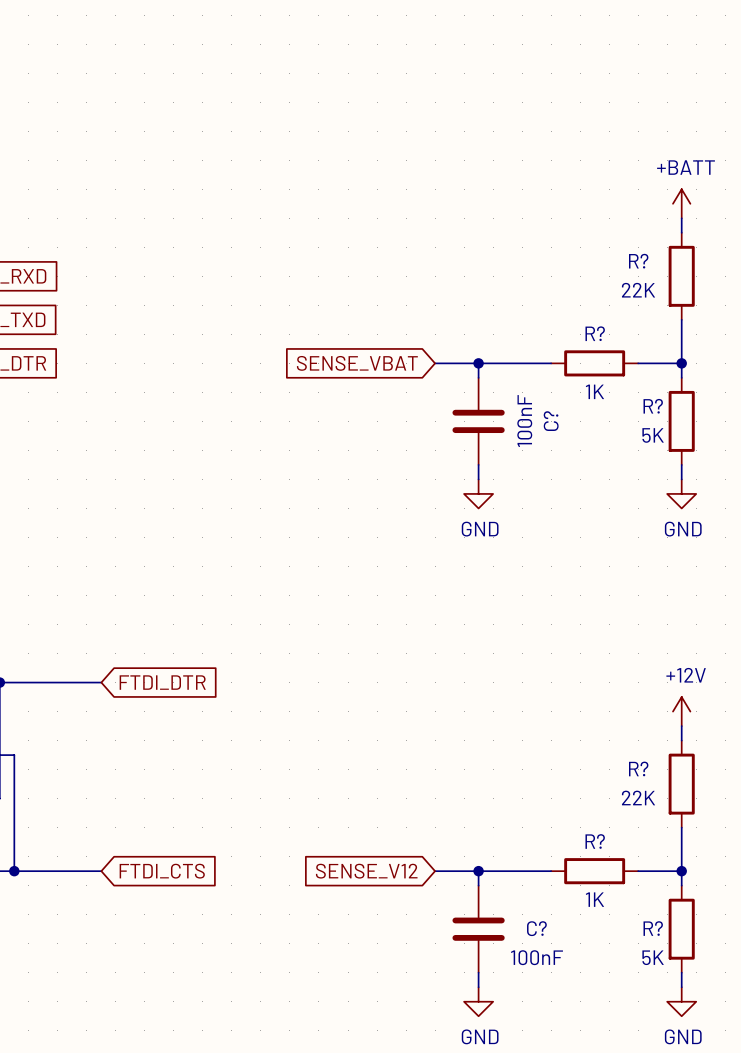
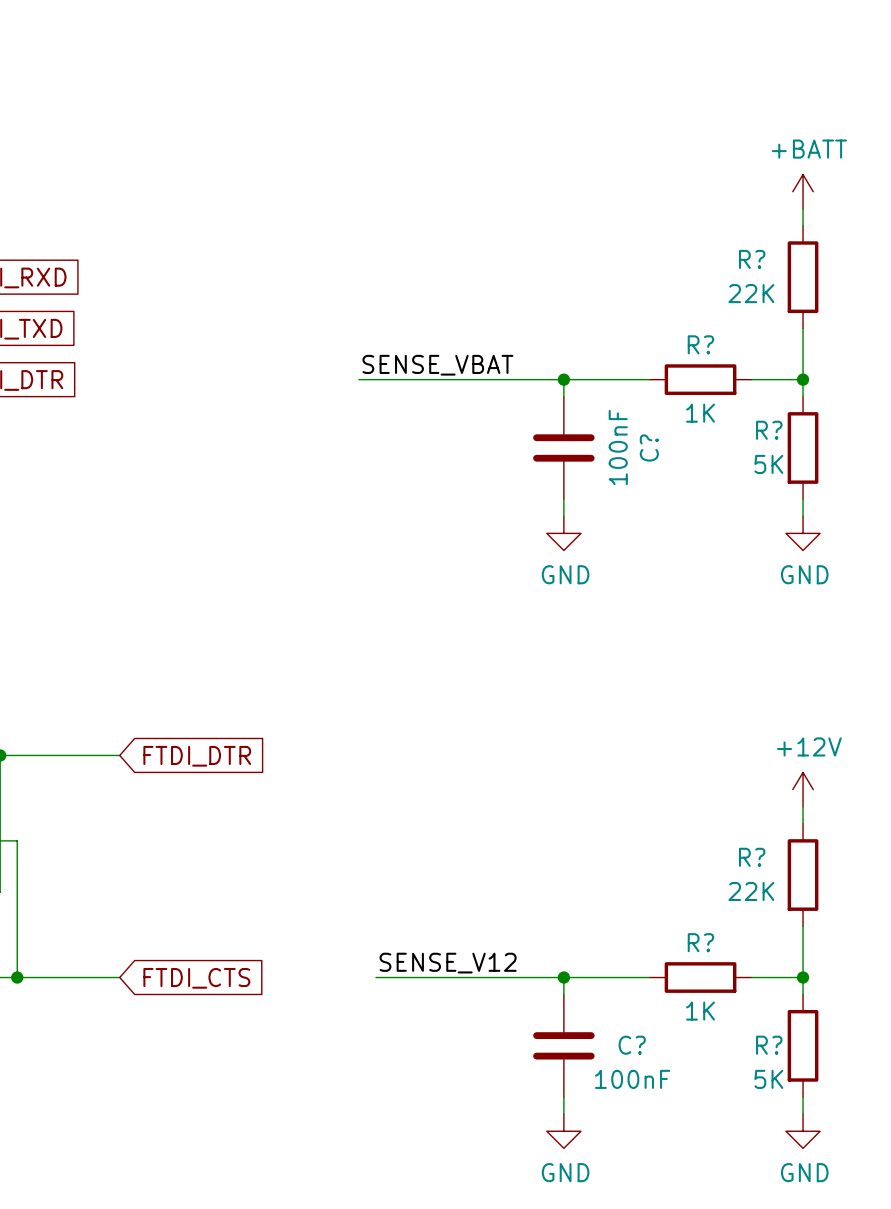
label: none -> SENSE_VBAT (437, 365)
wire: none -> (358, 379) (512, 379)
global label: SENSE_VBAT (357, 363) -> none
label: none -> SENSE_V12 (448, 963)
wire: none -> (375, 977) (512, 977)
global label: SENSE_V12 (366, 871) -> none

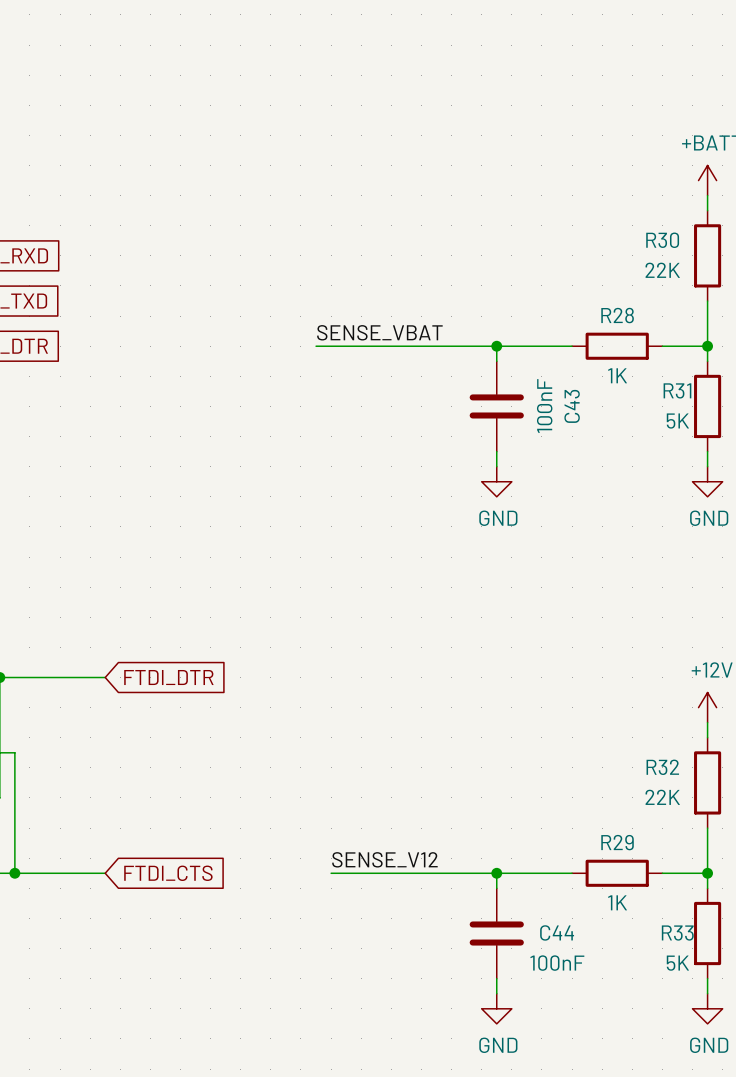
R? name: R? (752, 259) -> R30 (662, 240)
R? name: R? (700, 344) -> R28 (617, 315)
R? name: R? (769, 430) -> R31 (677, 390)
C? name: C? (649, 447) -> C43 (572, 406)
R? name: R? (752, 857) -> R32 (662, 767)
R? name: R? (700, 942) -> R29 (617, 842)
C? name: C? (632, 1045) -> C44 (557, 932)
R? name: R? (769, 1045) -> R33 (677, 933)

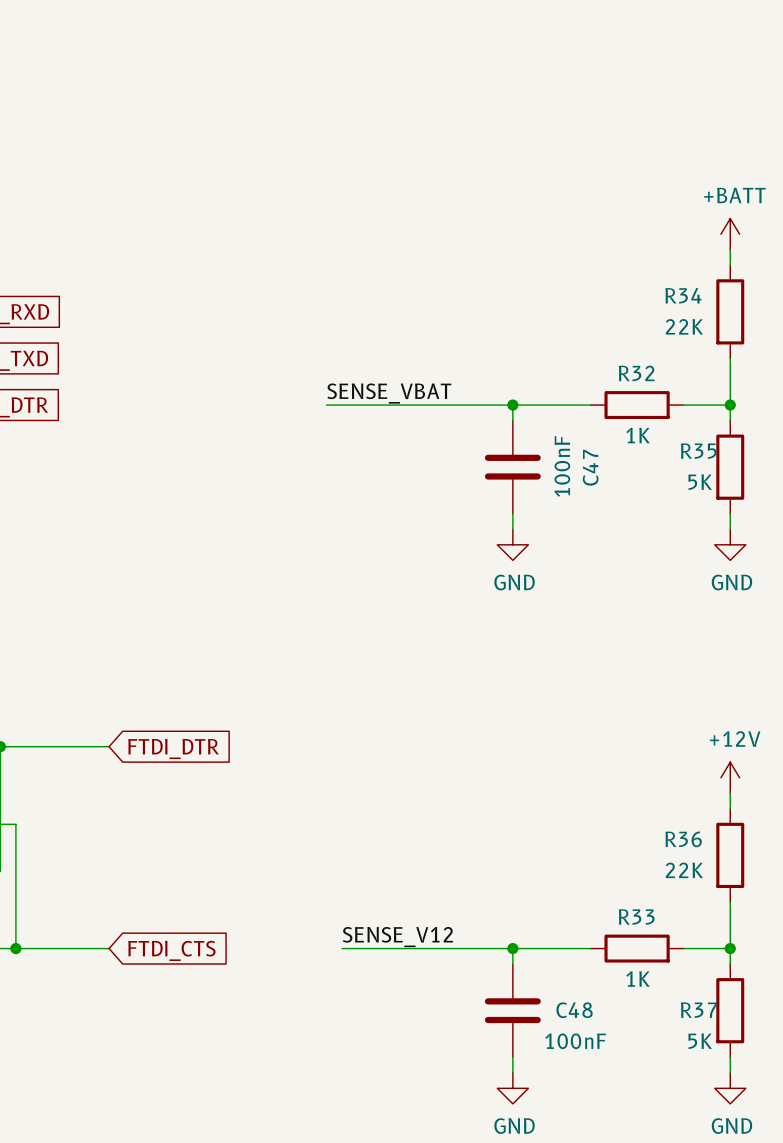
R30 name: R30 (662, 240) -> R34 (683, 295)
R28 name: R28 (617, 315) -> R32 (636, 373)
R31 name: R31 (677, 390) -> R35 (698, 451)
C43 name: C43 (572, 406) -> C47 (590, 467)
R32 name: R32 (662, 767) -> R36 (683, 839)
R29 name: R29 (617, 842) -> R33 (636, 916)
C44 name: C44 (557, 932) -> C48 (574, 1010)
R33 name: R33 (677, 933) -> R37 (698, 1010)

